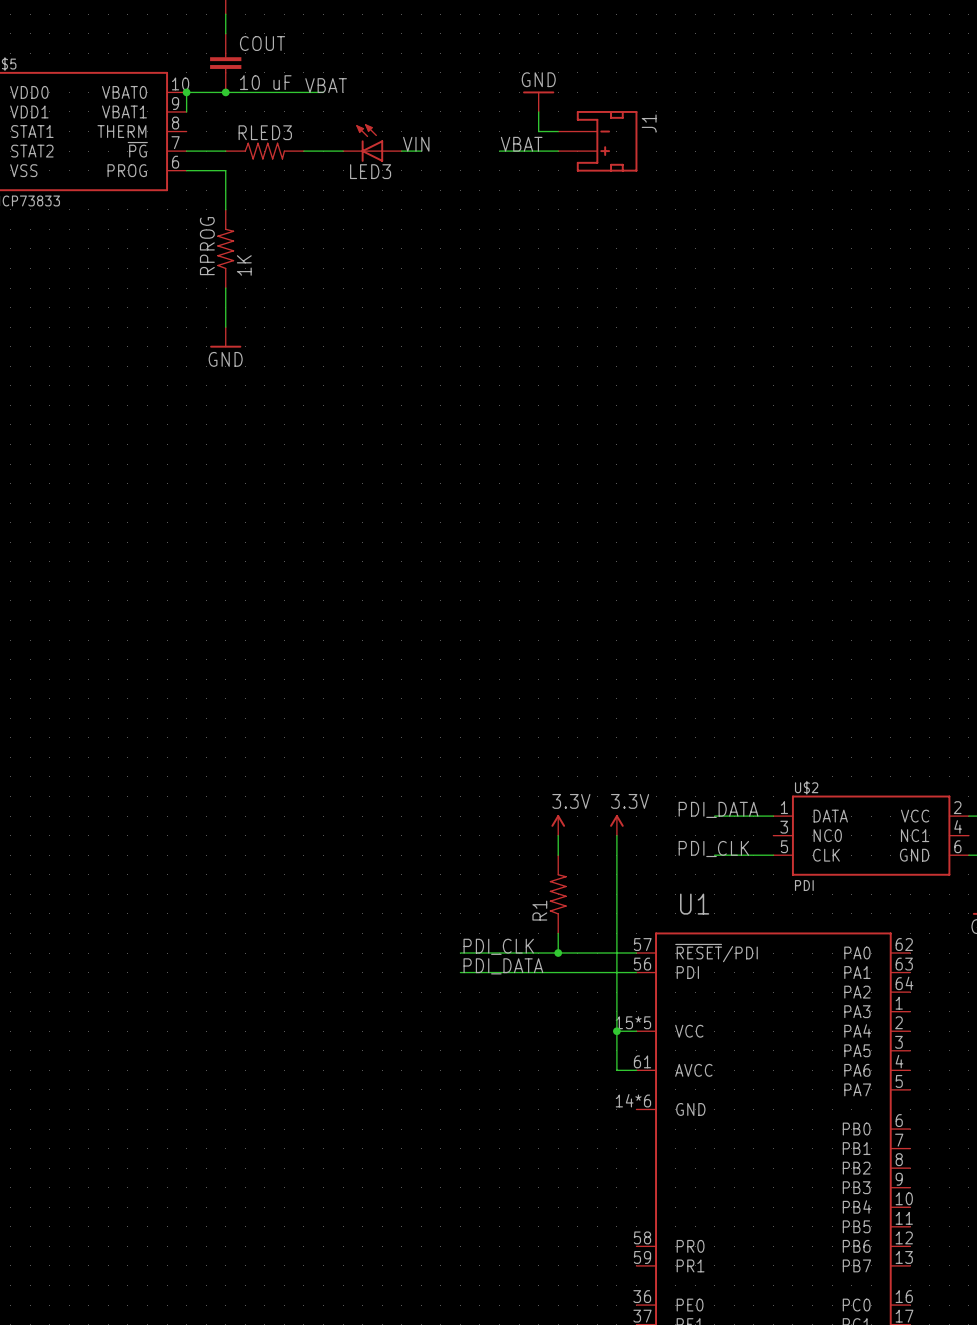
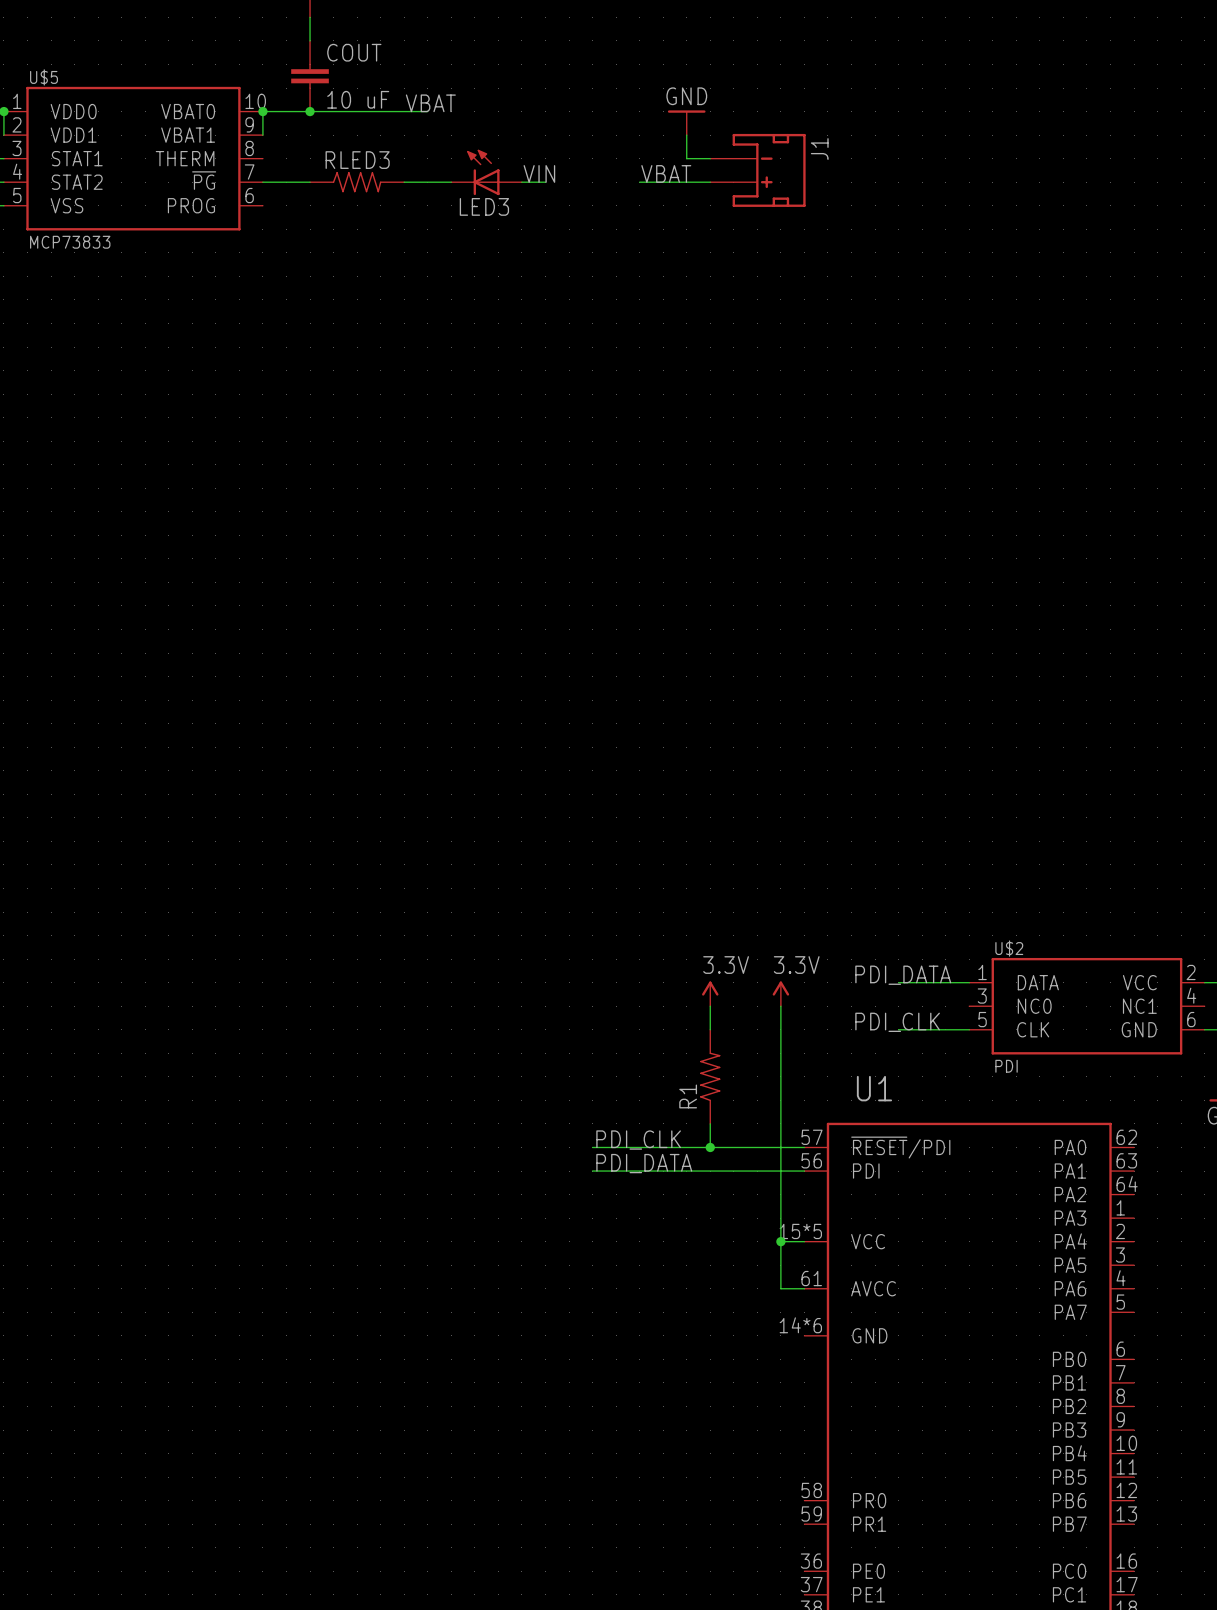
wire: (186, 170) (225, 170) (225, 209) -> none
RPROG: 1K (225, 248) -> none
wire: (225, 288) (225, 327) -> none
power symbol: GND (225, 337) -> none

